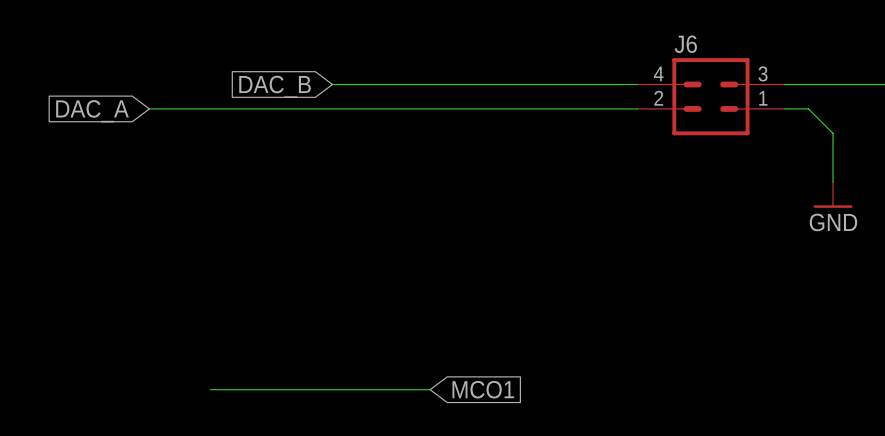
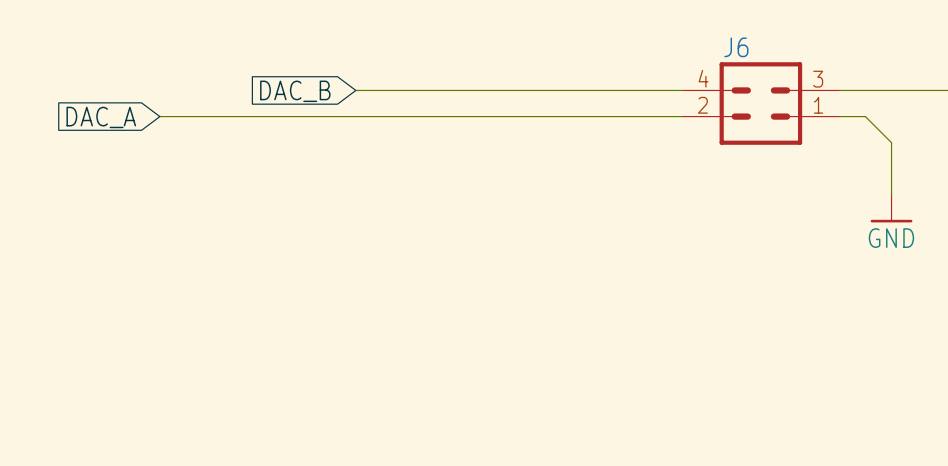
wire: (210, 389) (430, 389) -> none
global label: MCO1 (483, 389) -> none

